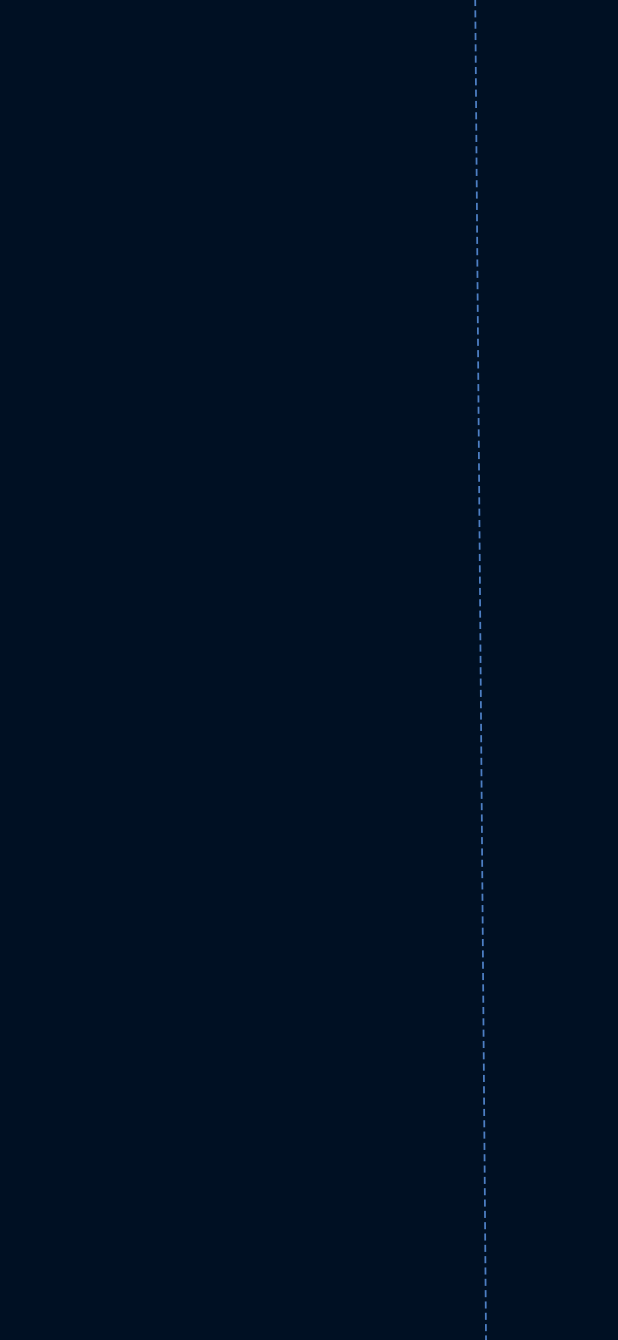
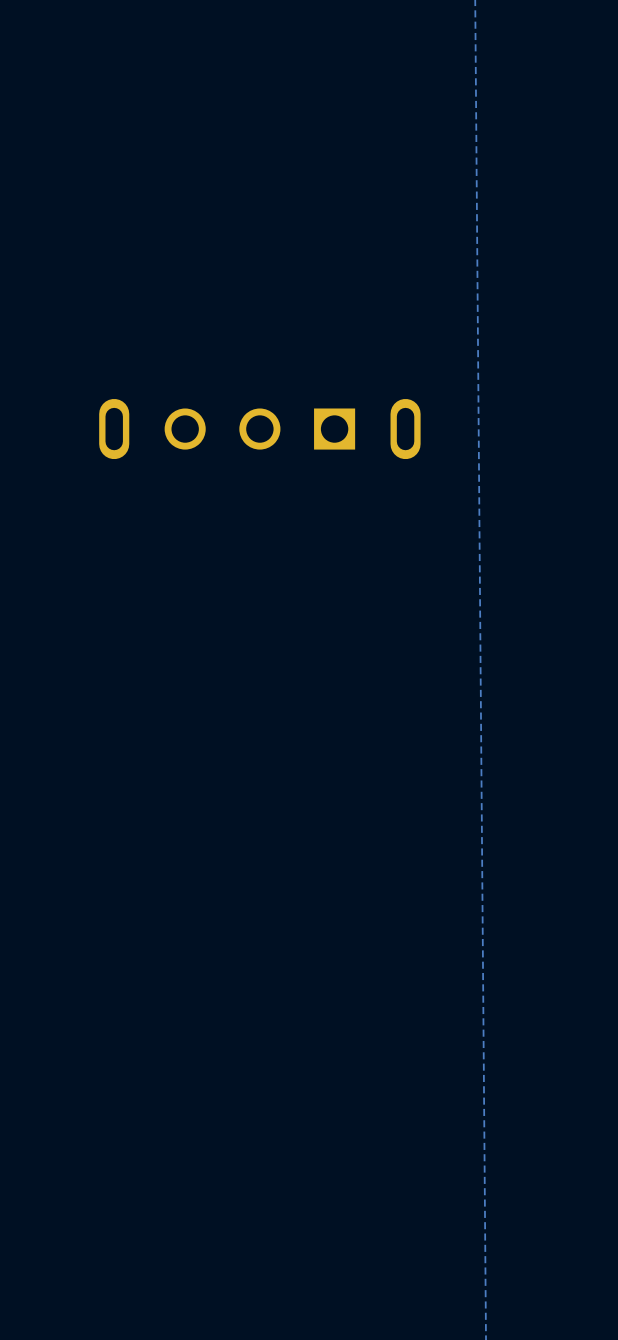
part: none -> (259, 429)

